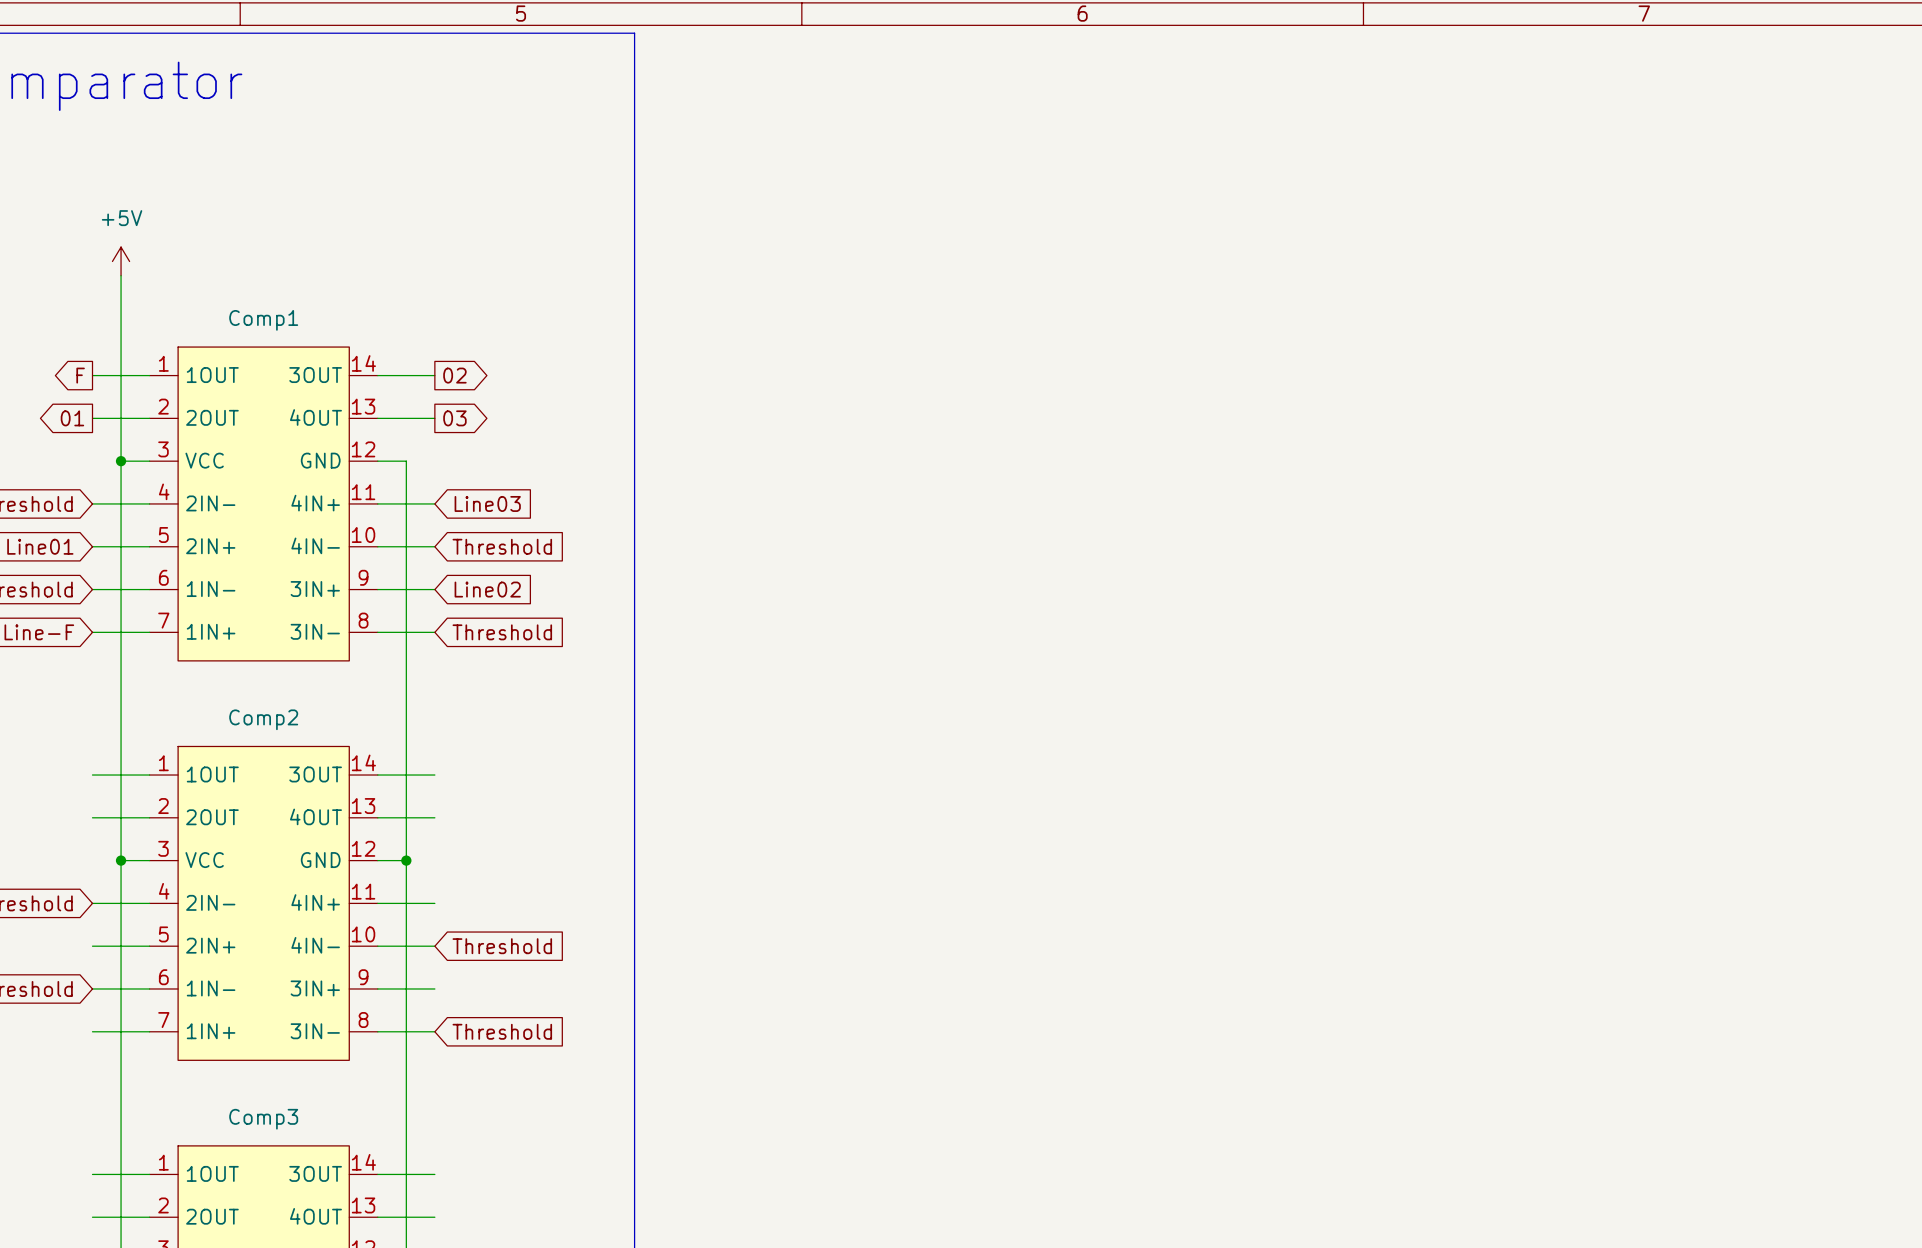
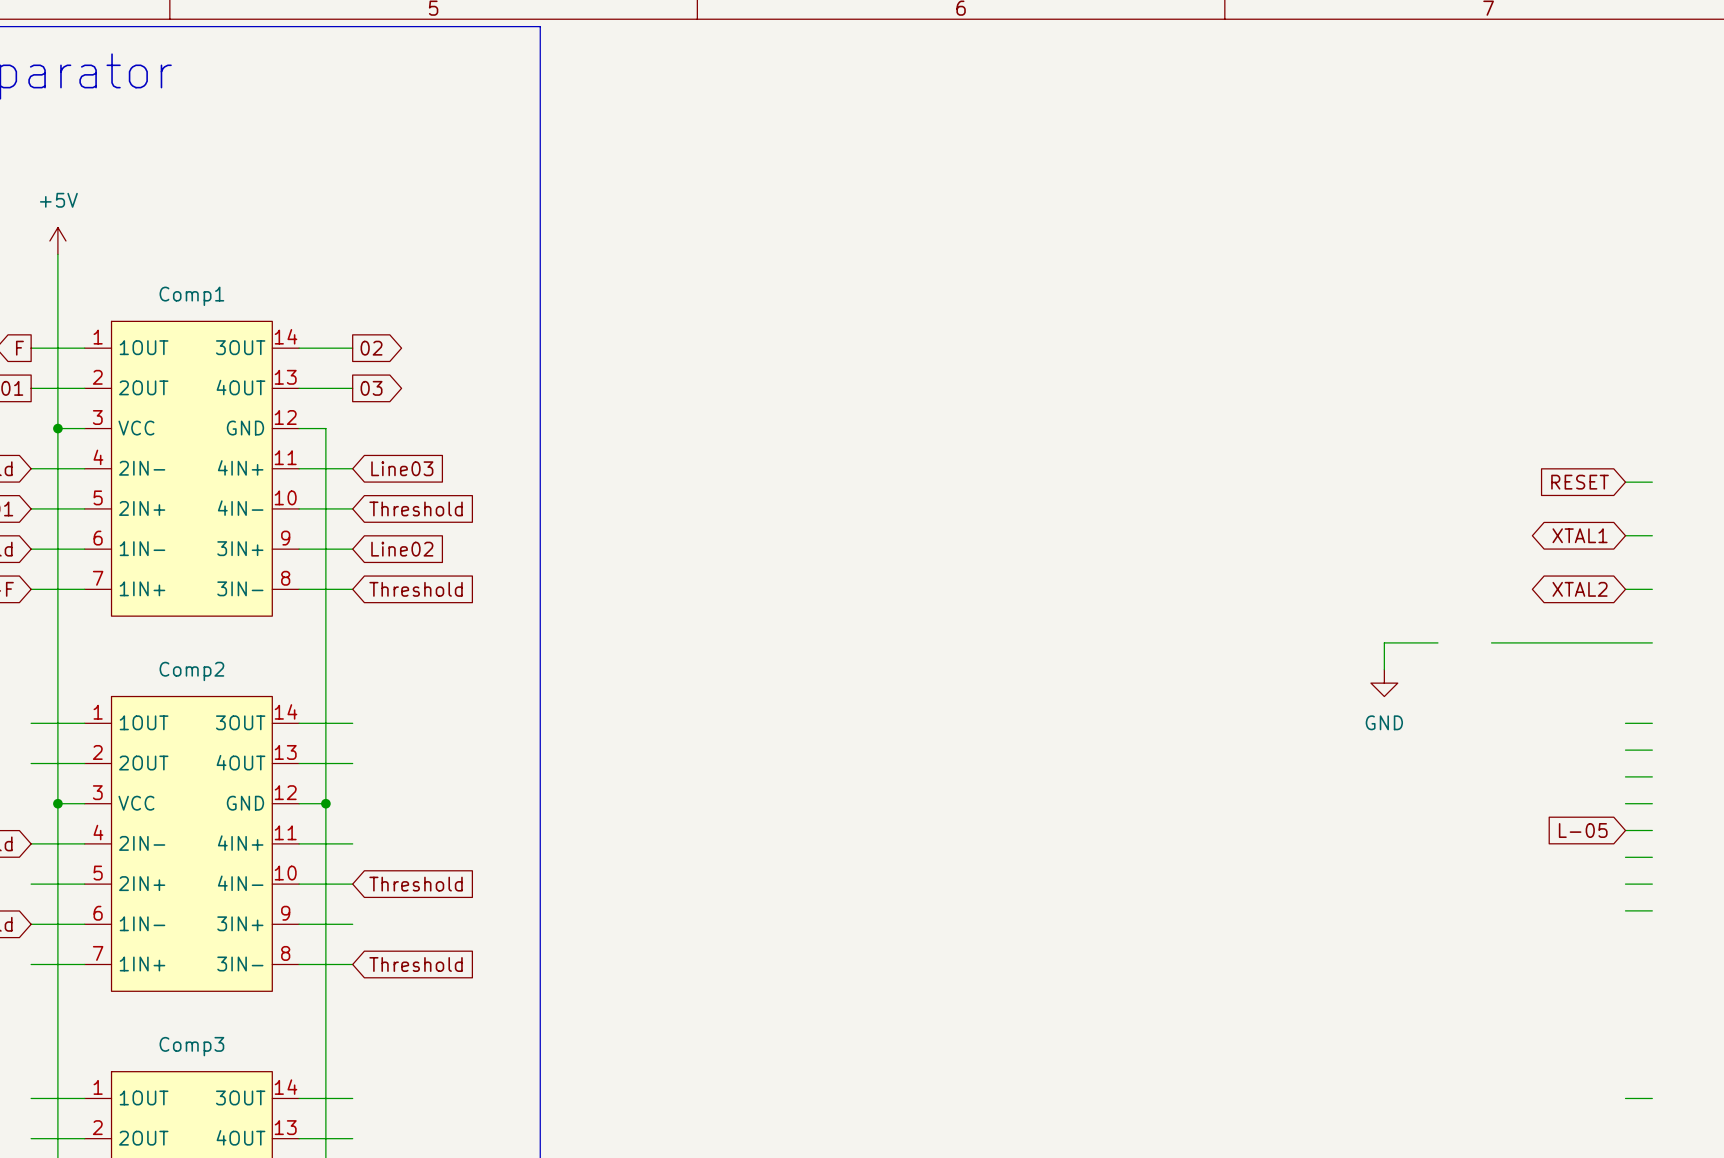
global label: none -> RESET (1580, 482)
wire: none -> (1625, 482) (1652, 482)
global label: none -> XTAL1 (1580, 535)
wire: none -> (1625, 535) (1652, 535)
global label: none -> XTAL2 (1580, 589)
wire: none -> (1625, 589) (1652, 589)
wire: none -> (1437, 642) (1384, 642) (1384, 669)
wire: none -> (1491, 642) (1652, 642)
power symbol: none -> GND (1384, 683)
wire: none -> (1625, 723) (1652, 723)
wire: none -> (1625, 750) (1652, 750)
wire: none -> (1625, 776) (1652, 776)
wire: none -> (1625, 803) (1652, 803)
global label: none -> L-05 (1583, 830)
wire: none -> (1625, 830) (1652, 830)
wire: none -> (1625, 857) (1652, 857)
wire: none -> (1625, 884) (1652, 884)
wire: none -> (1625, 910) (1652, 910)
wire: none -> (1625, 1098) (1652, 1098)

